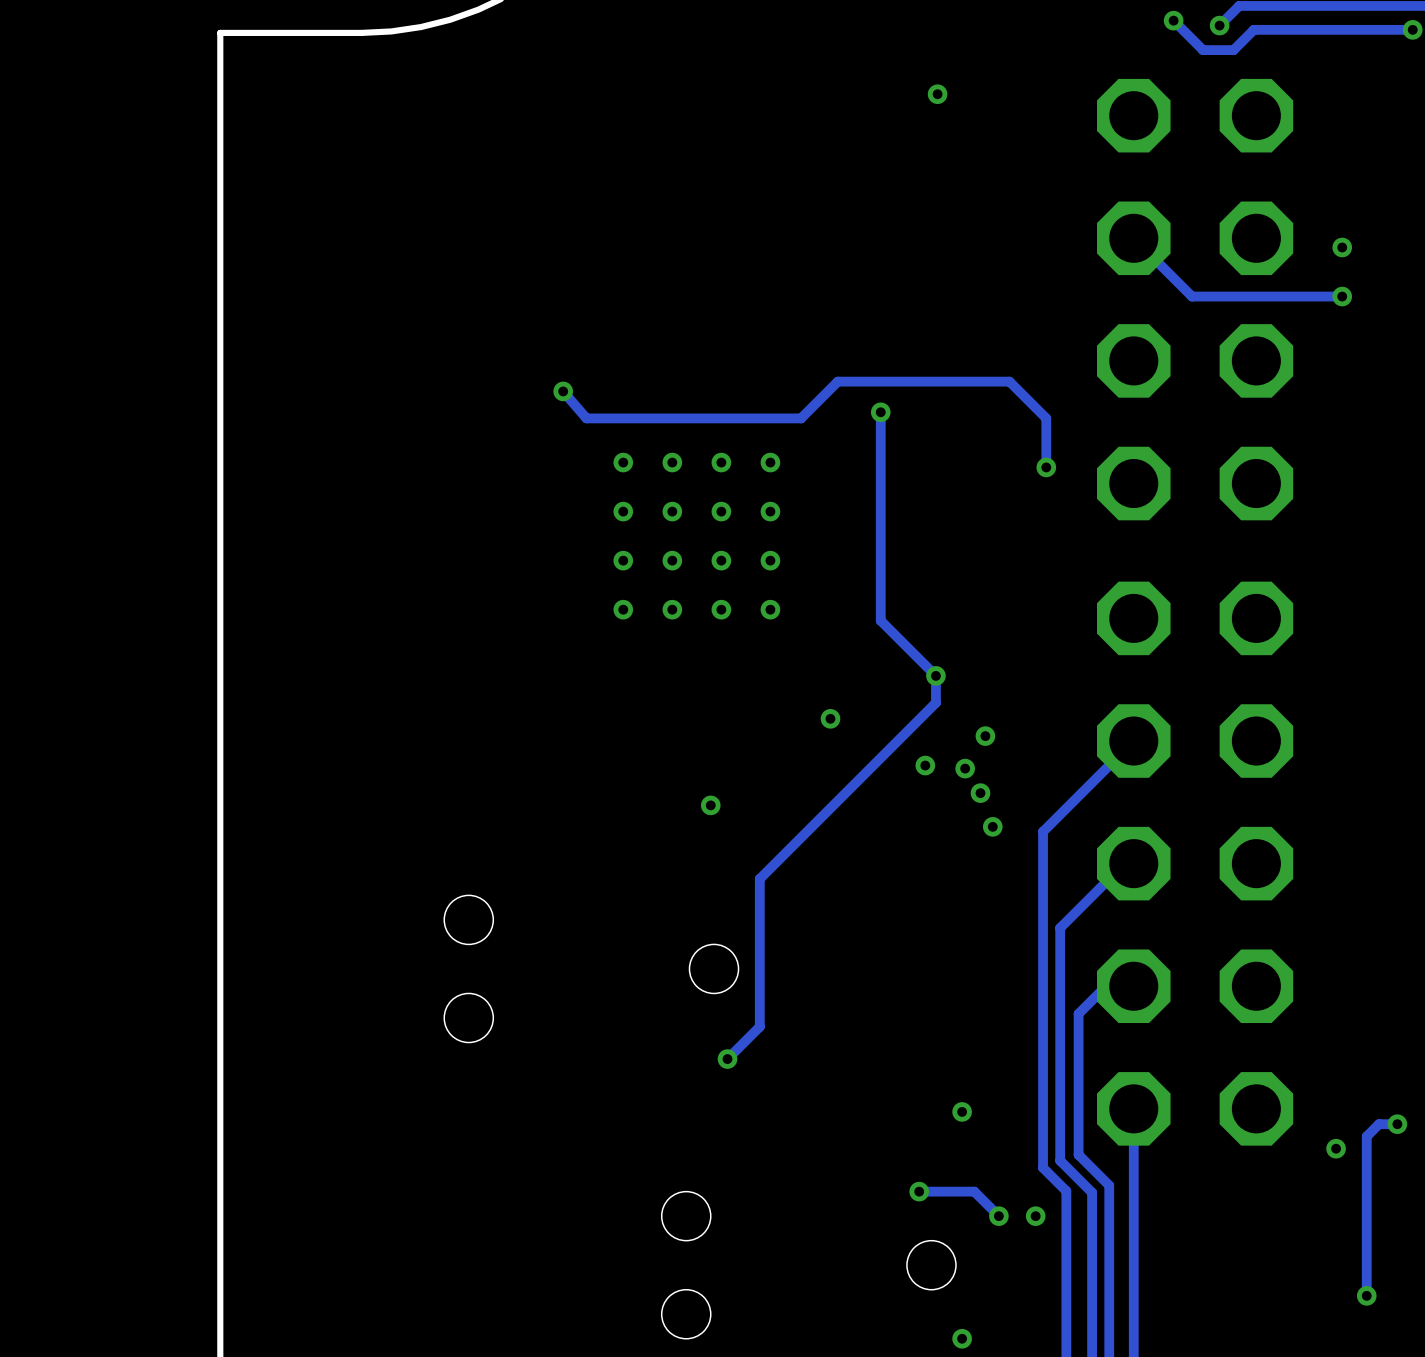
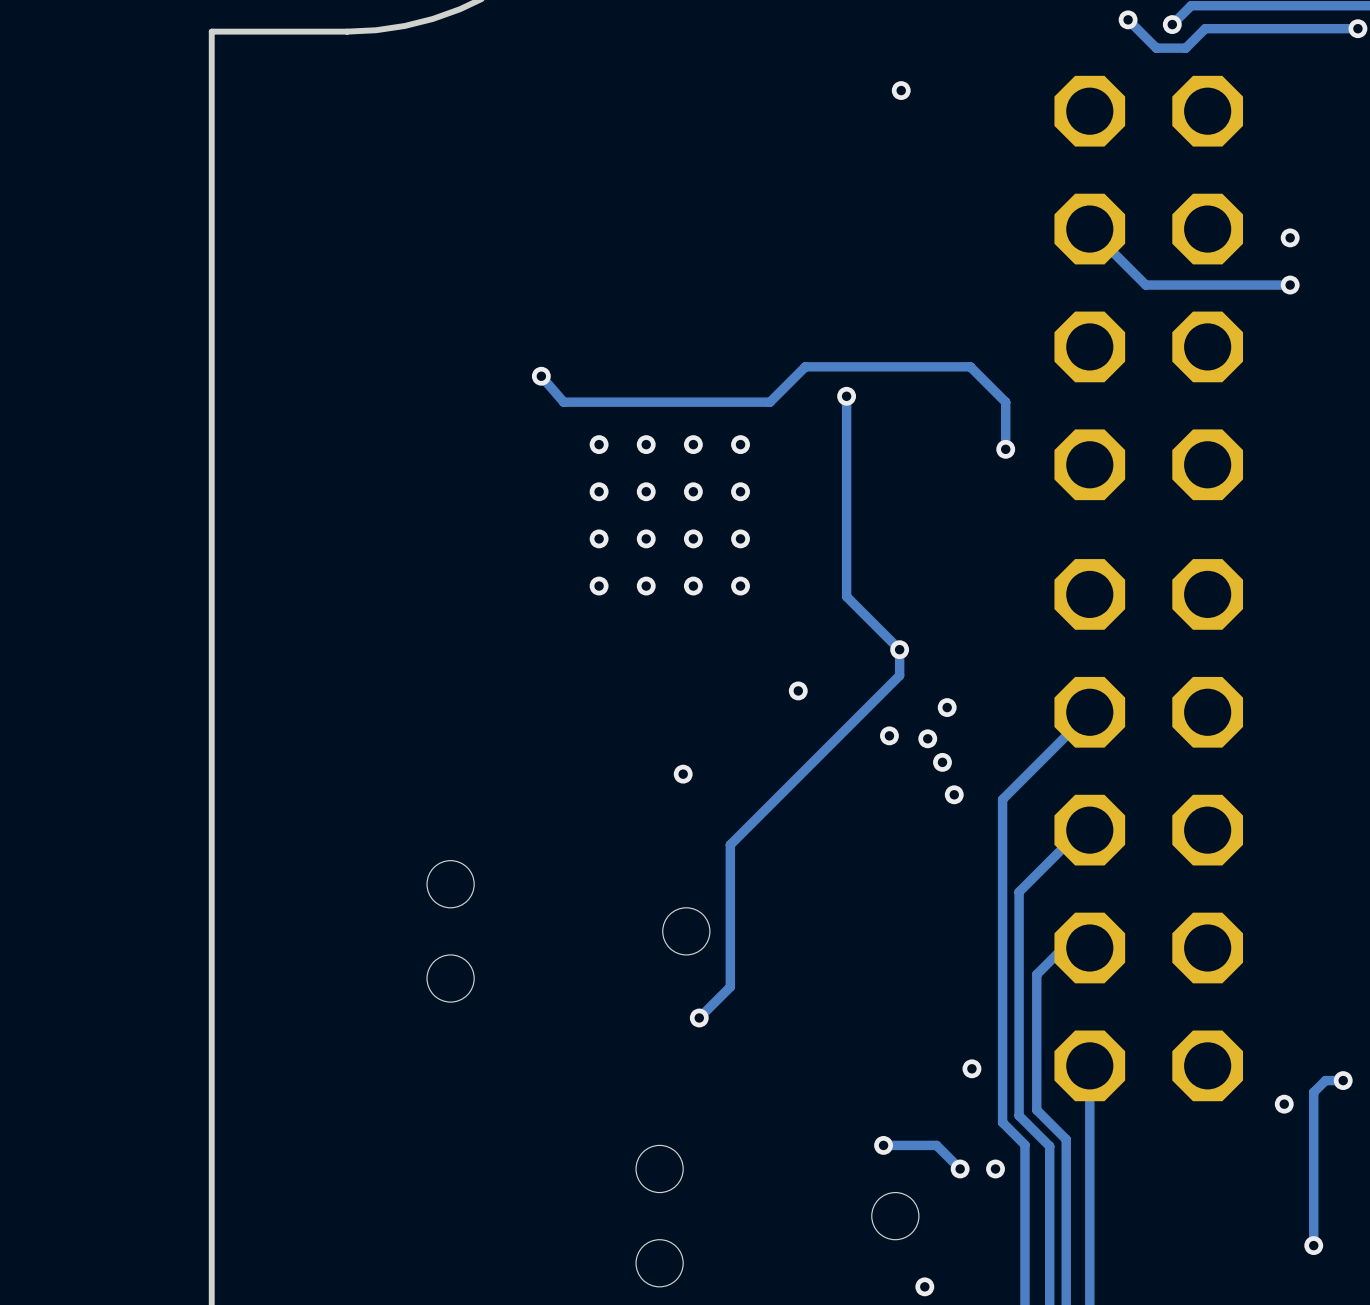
via position: (962, 1111) -> (971, 1068)

